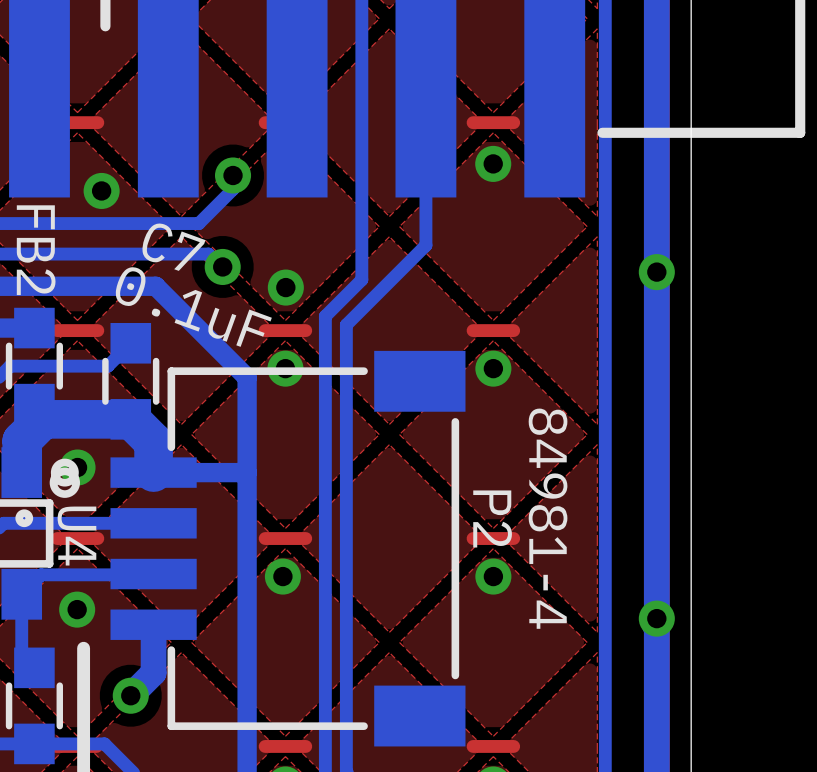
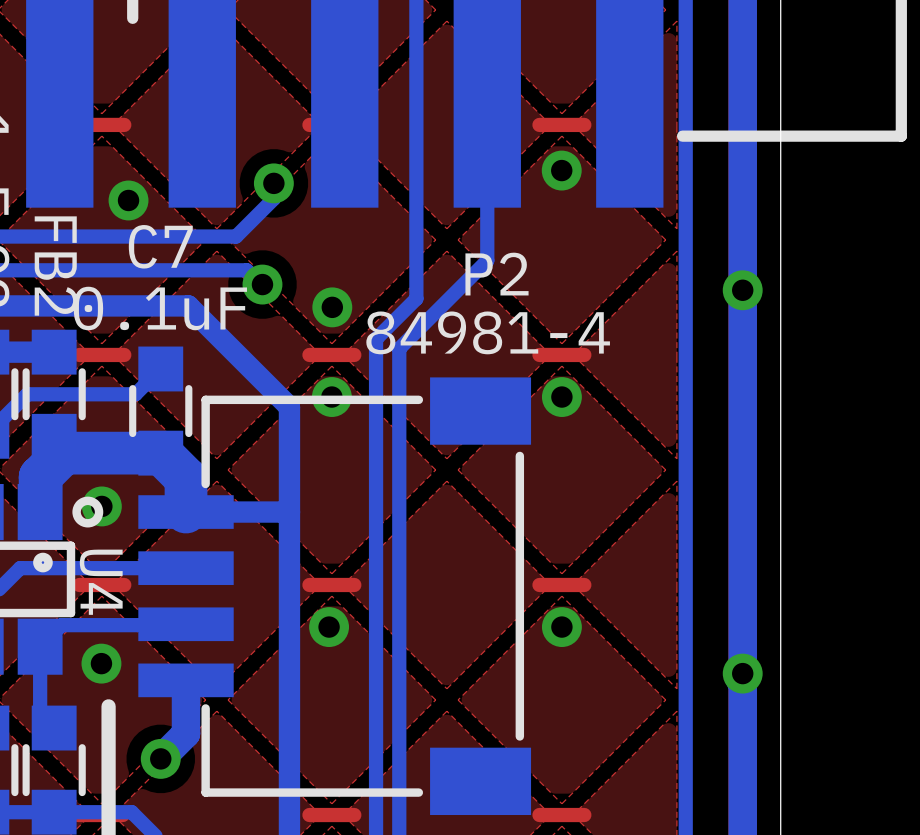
C7 name rotation: 0° (173, 246) -> 20° counterclockwise (160, 246)
C7 value rotation: 0° (193, 306) -> 20° counterclockwise (160, 308)
drawing: [49, 467, 80, 498] -> none
P2 name rotation: 0° (492, 518) -> 90° counterclockwise (497, 274)
P2 name position: P2 (492, 518) -> P2 (497, 274)
text rotation: 0° (548, 518) -> 90° counterclockwise (488, 332)

